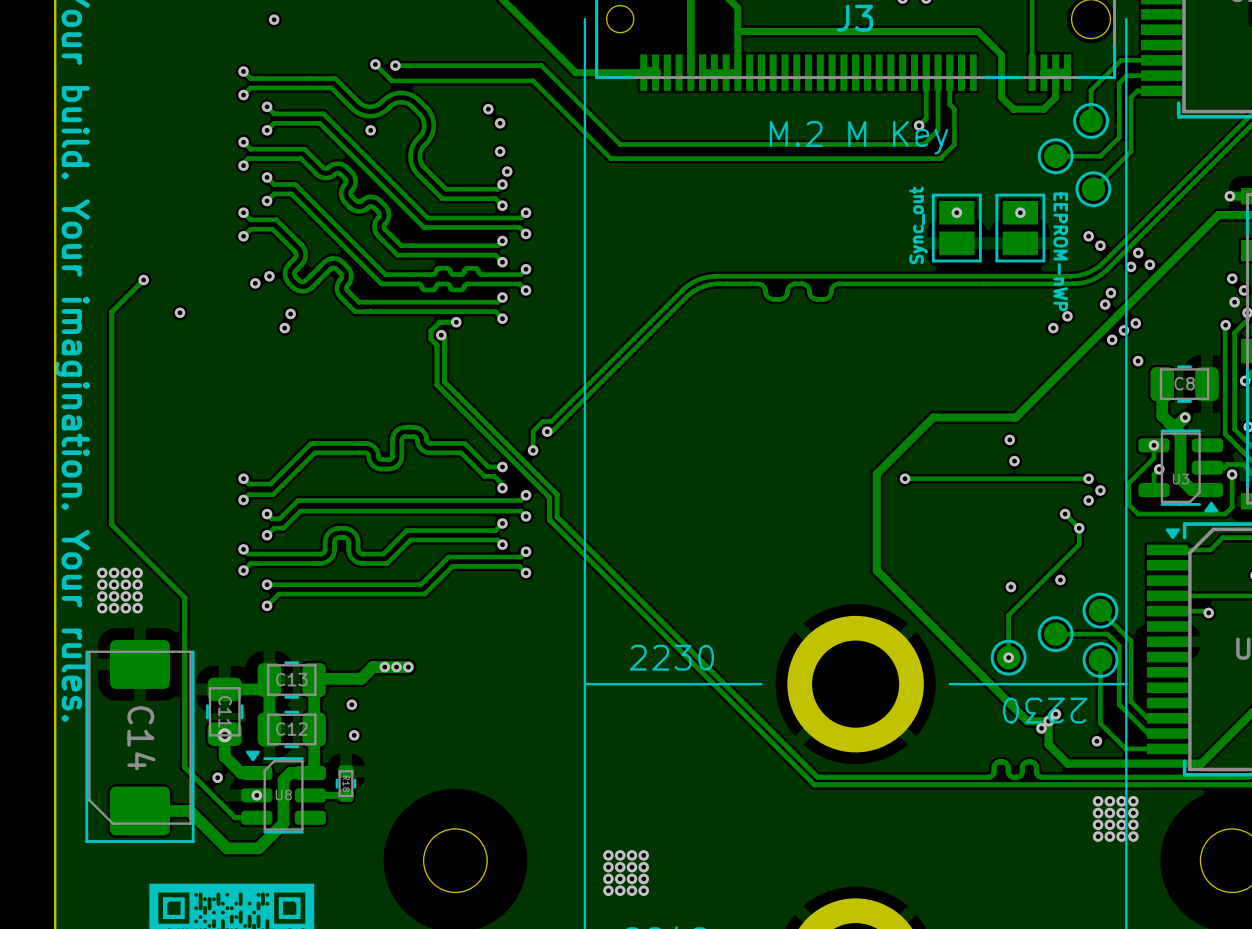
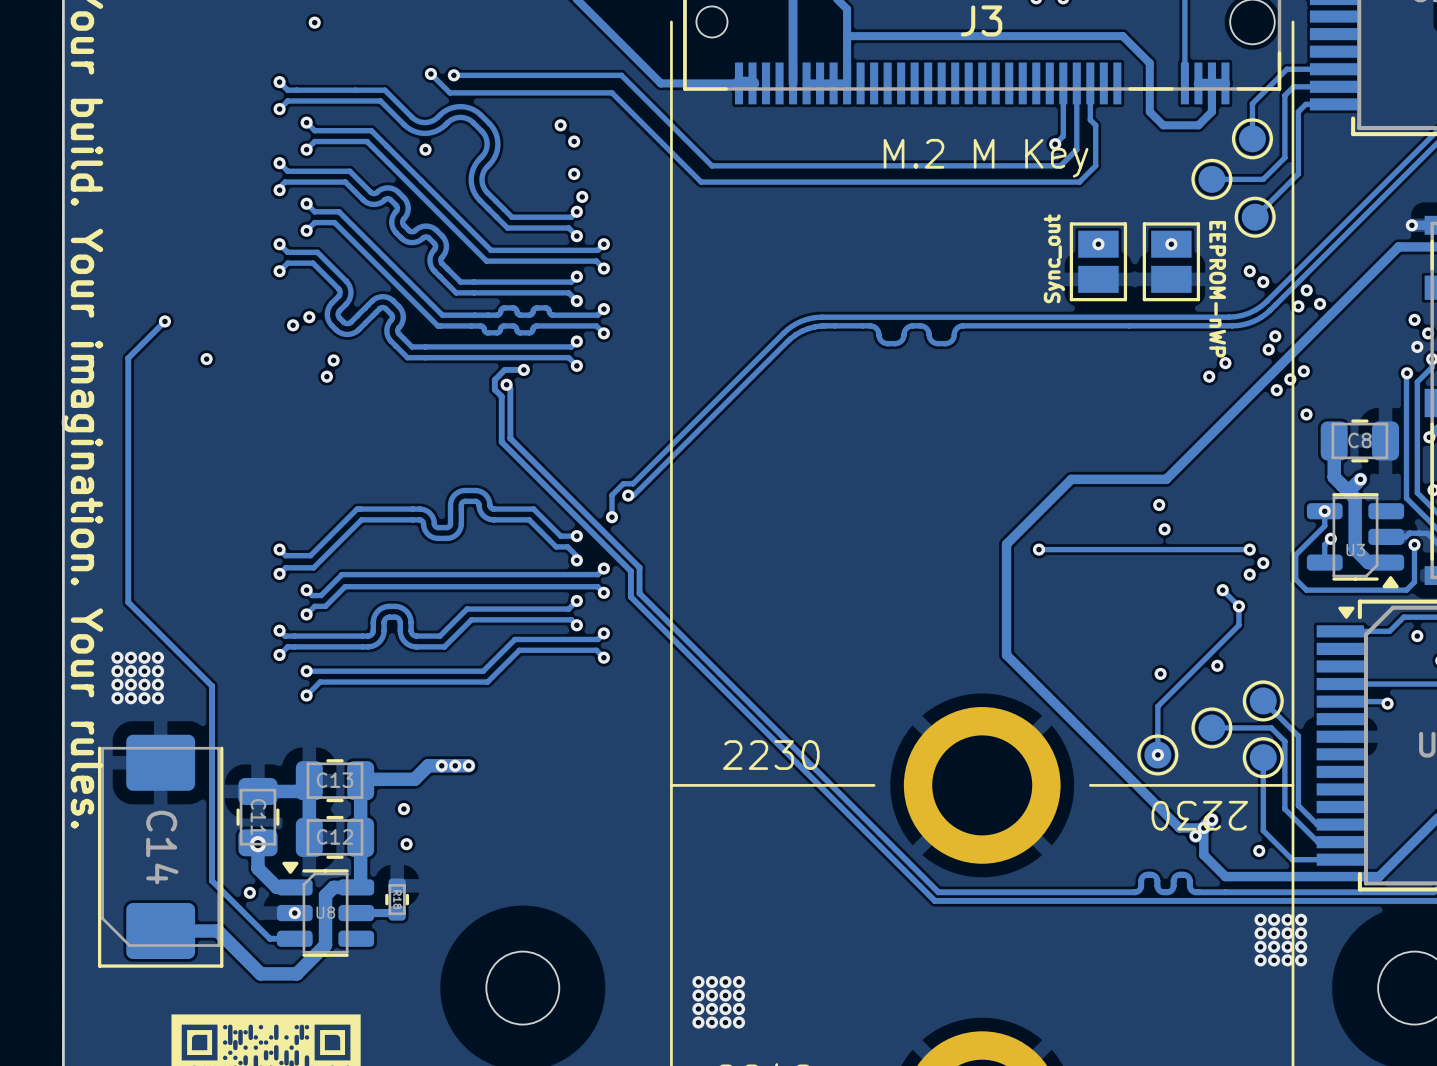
via: none -> (1417, 636)

